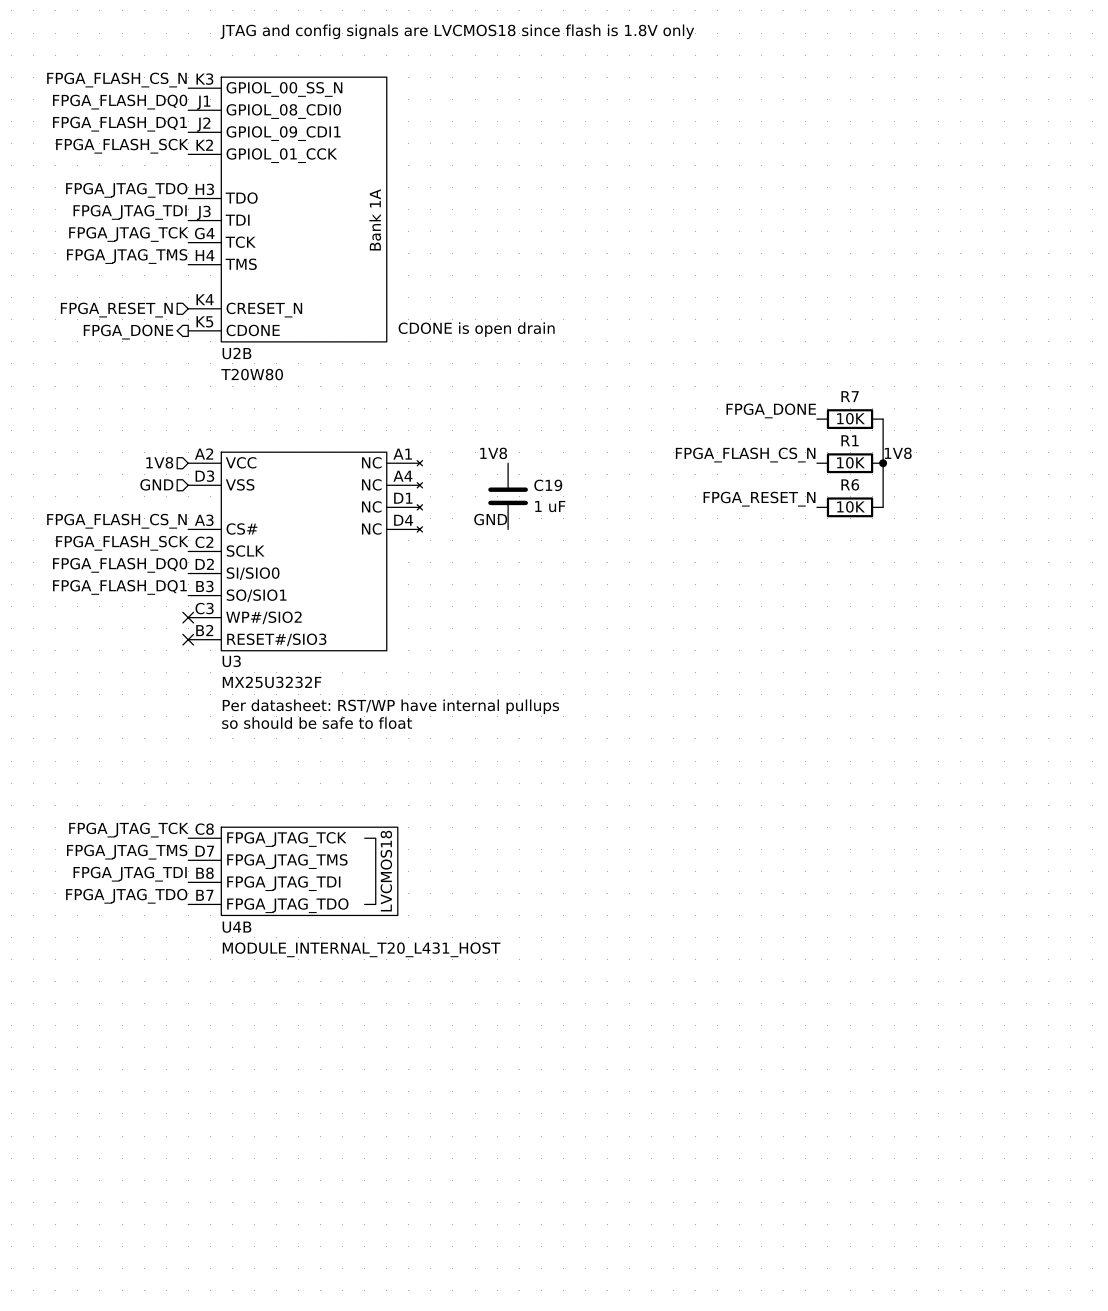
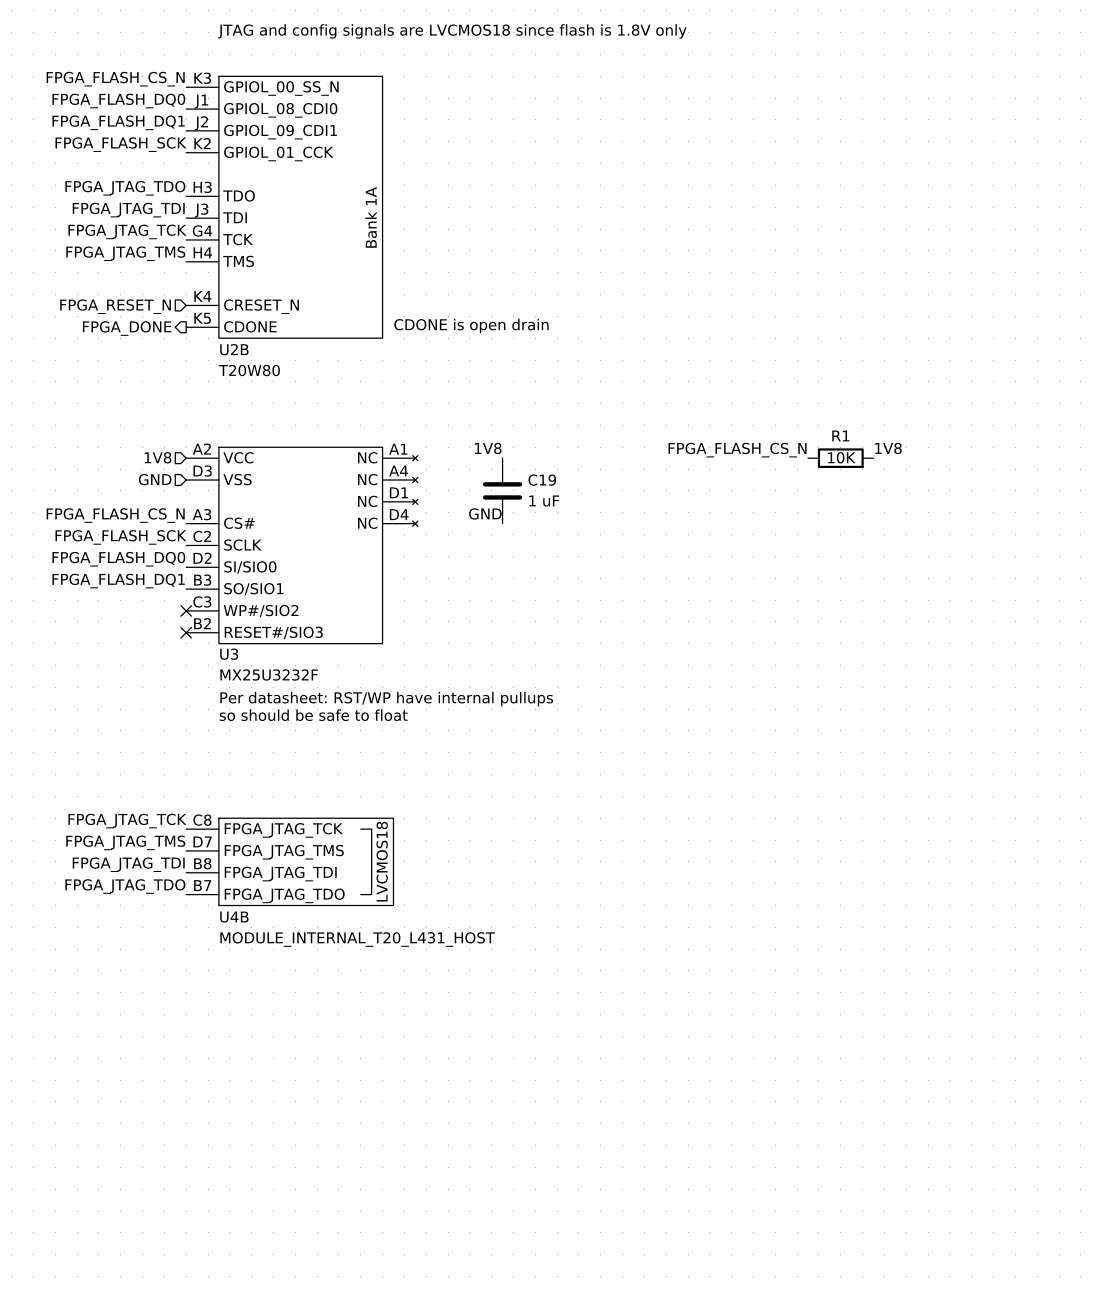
label: FPGA_DONE (771, 410) -> none
R7: 10K (850, 419) -> none
wire: (883, 419) (883, 507) -> none
junction: (883, 463) -> none
label: FPGA_RESET_N (759, 499) -> none
R6: 10K (850, 507) -> none

